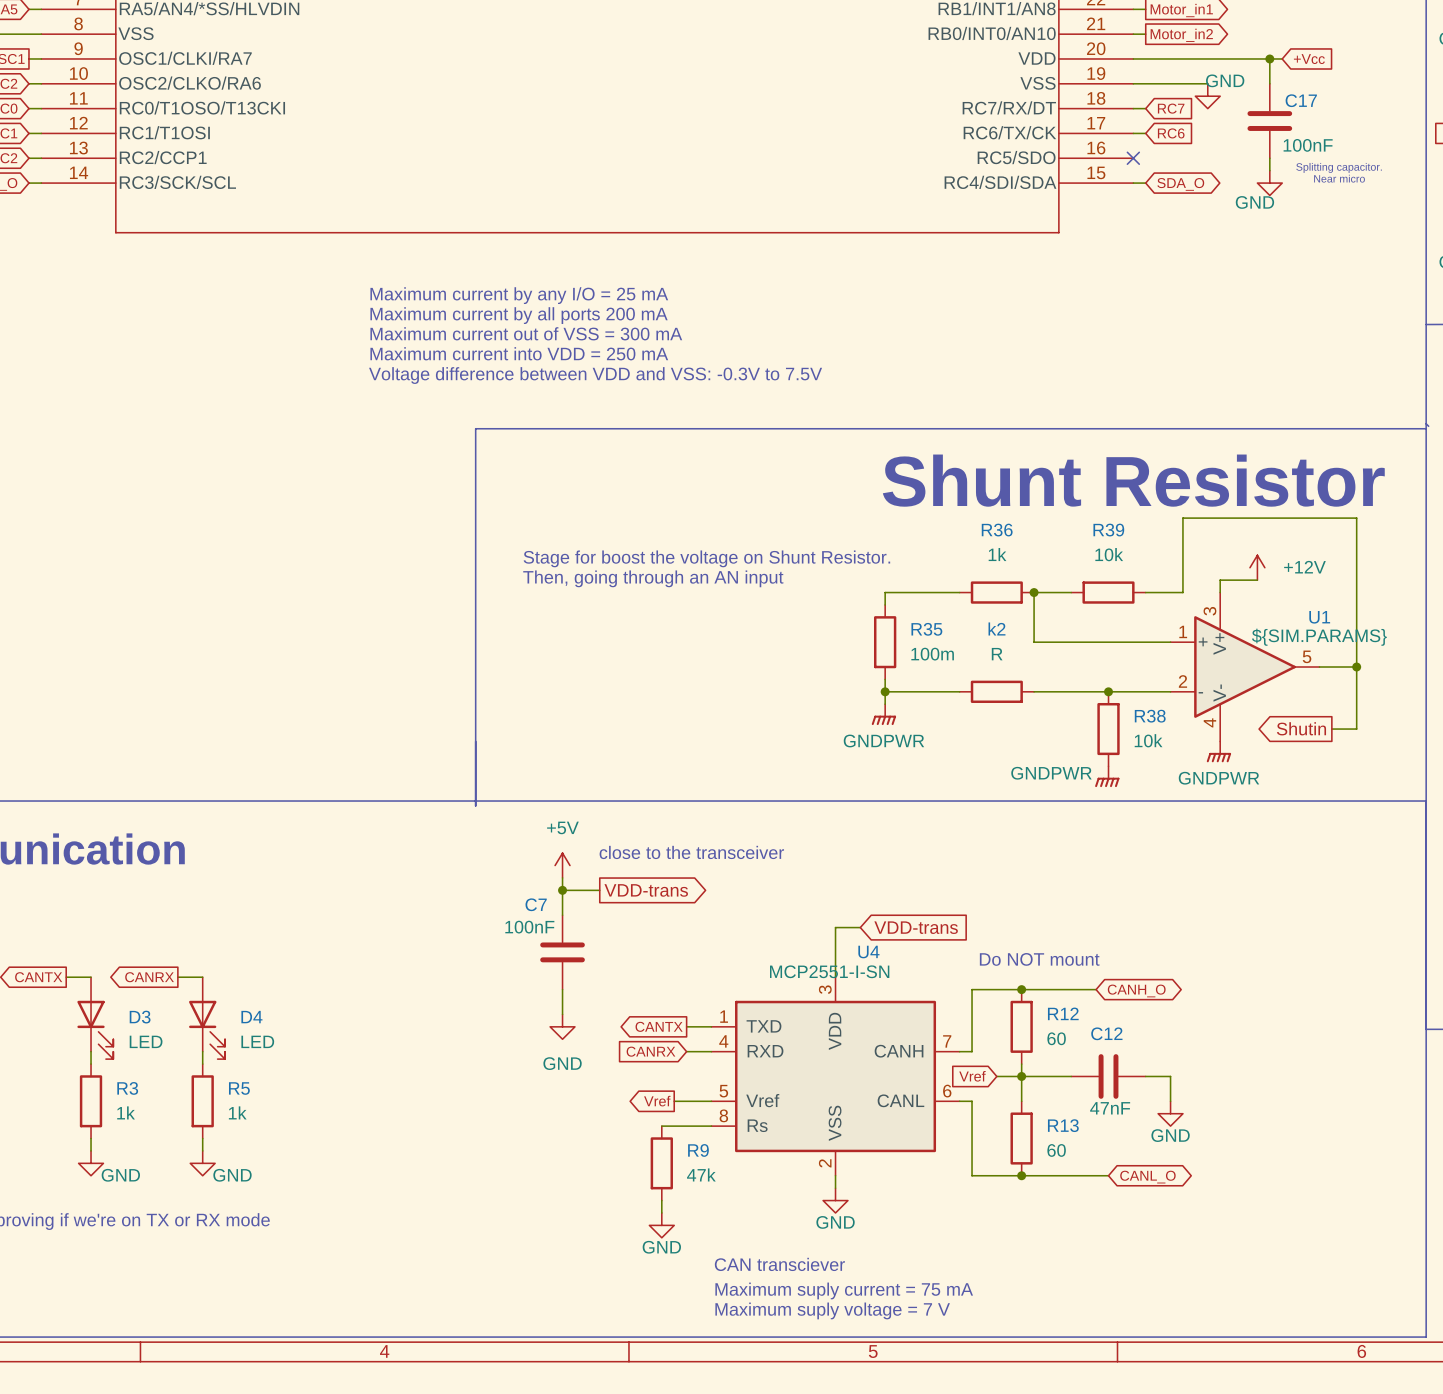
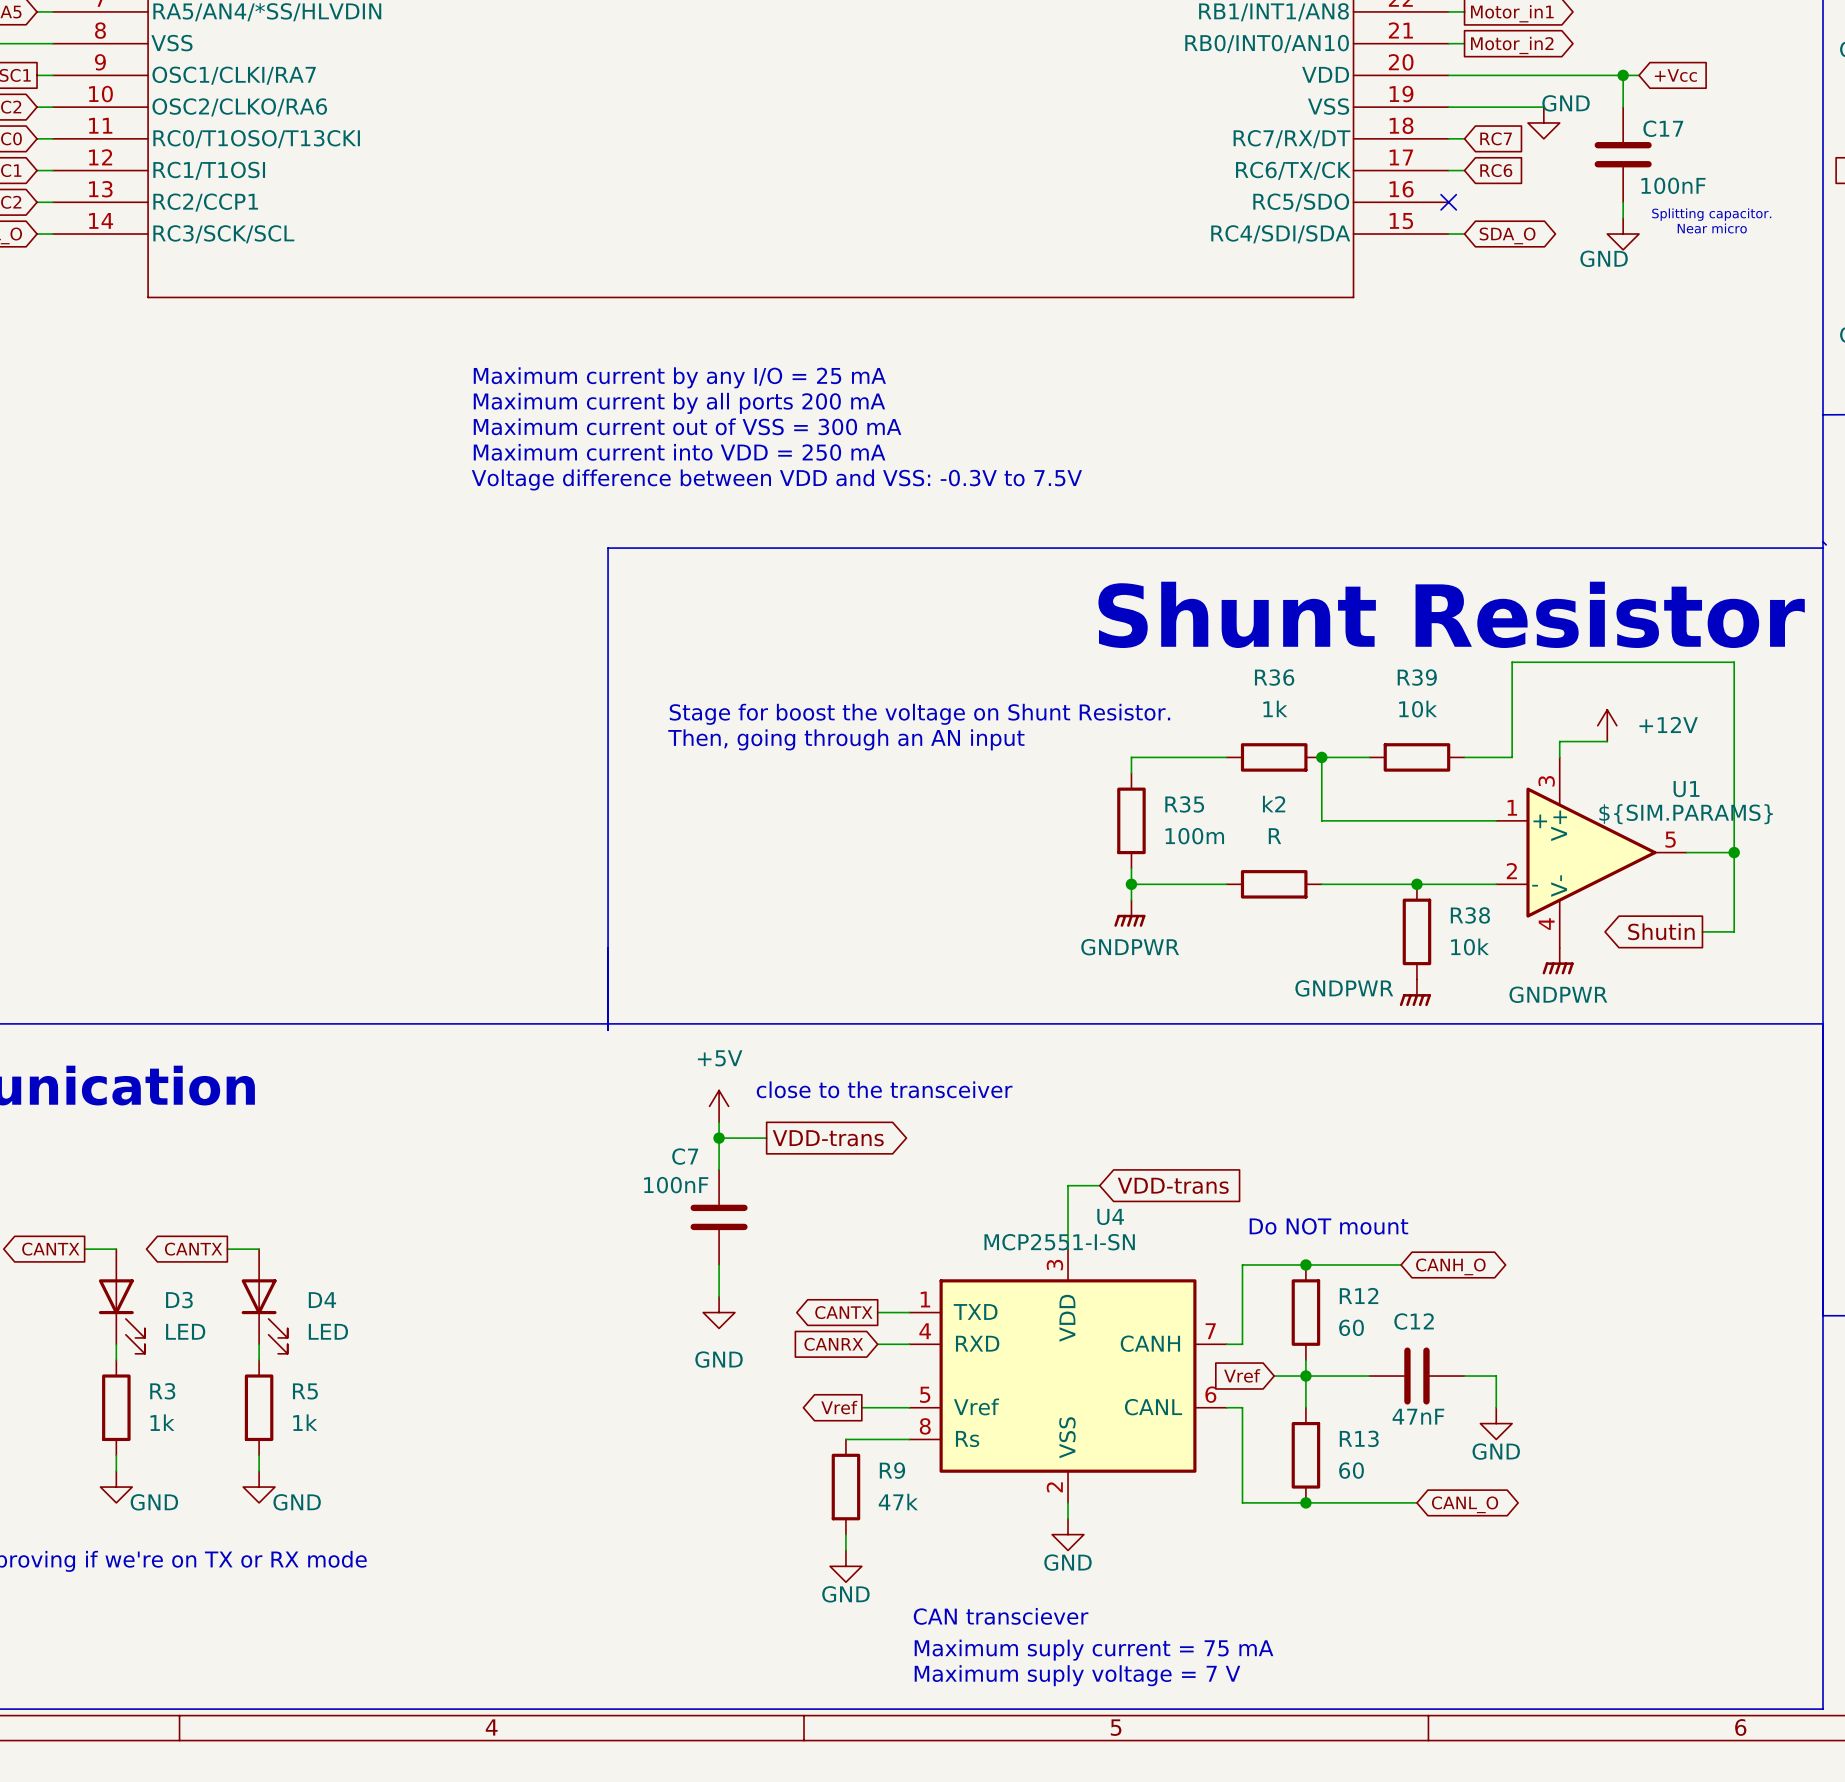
global label: CANRX (149, 977) -> CANTX (193, 1249)

